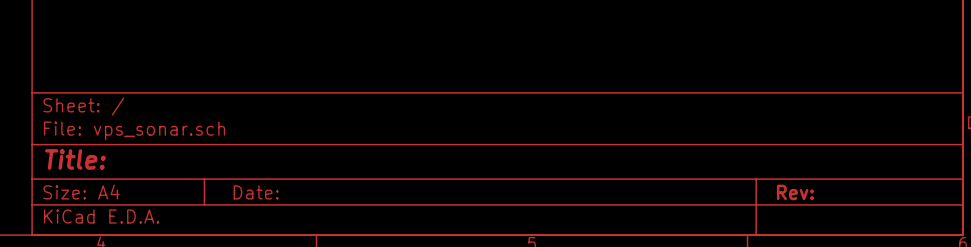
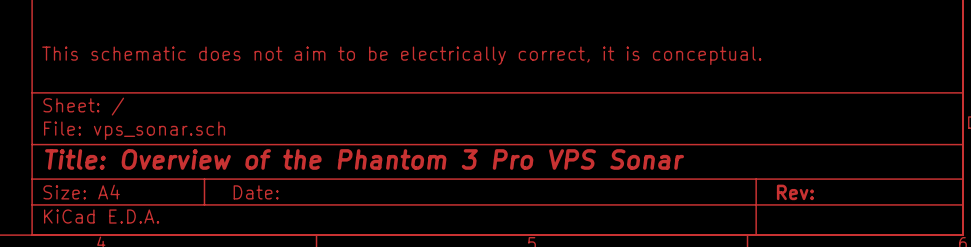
title block: none -> This schematic does not aim to be electrically correct, it is conceptual. (401, 55)
title block: Title: (75, 159) -> Title: Overview of the Phantom 3 Pro VPS Sonar (364, 159)

